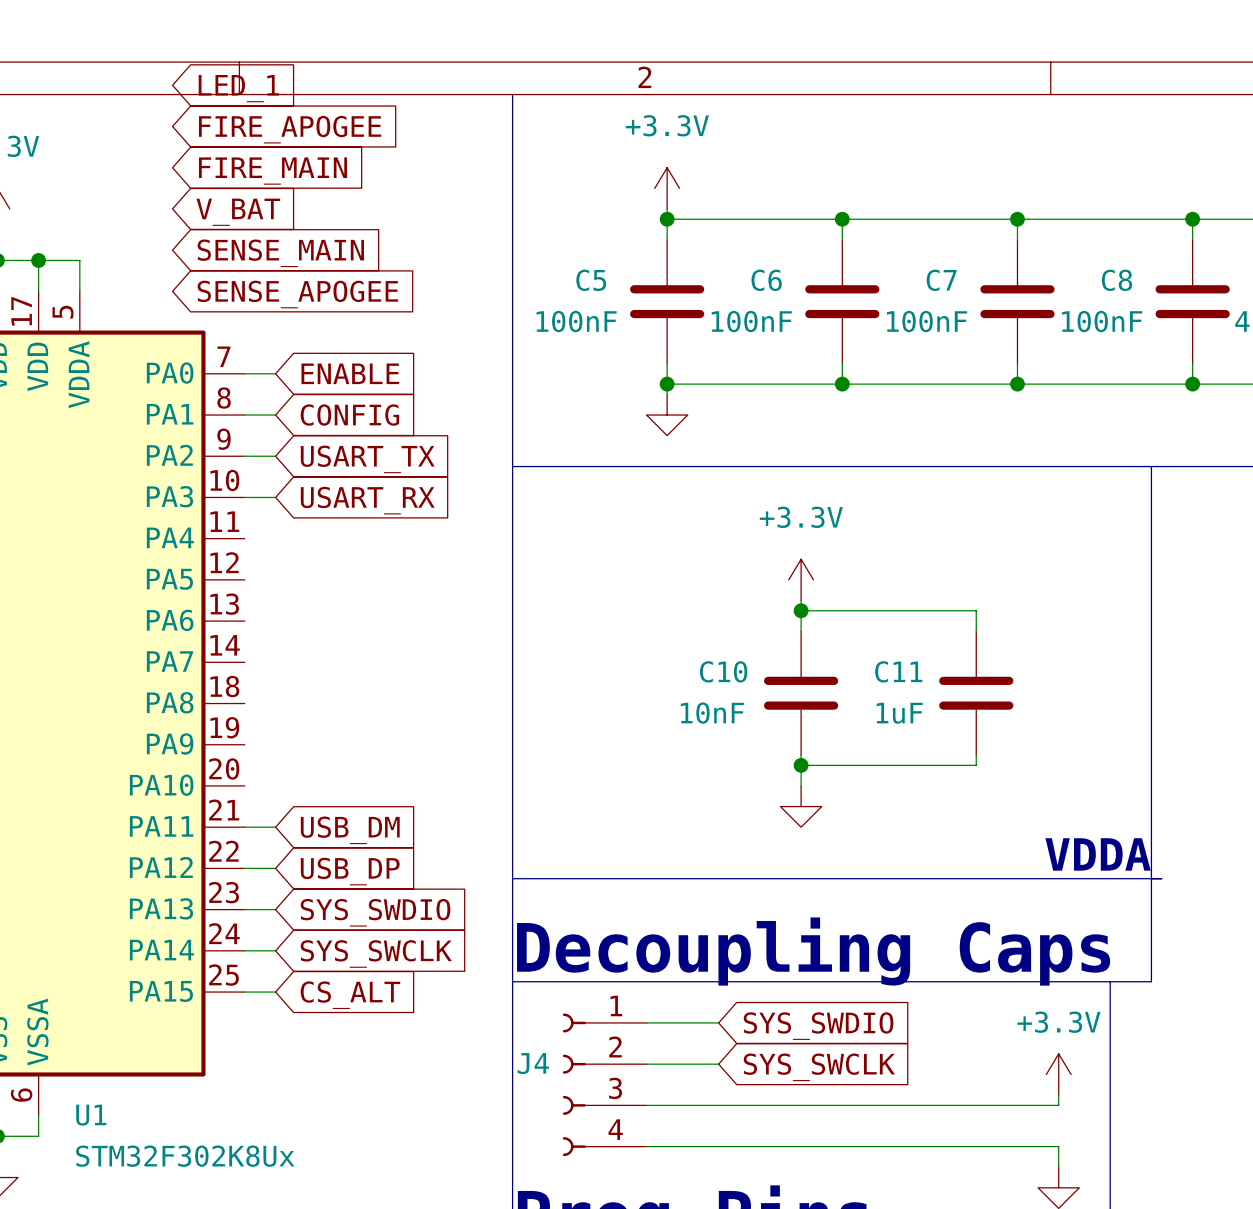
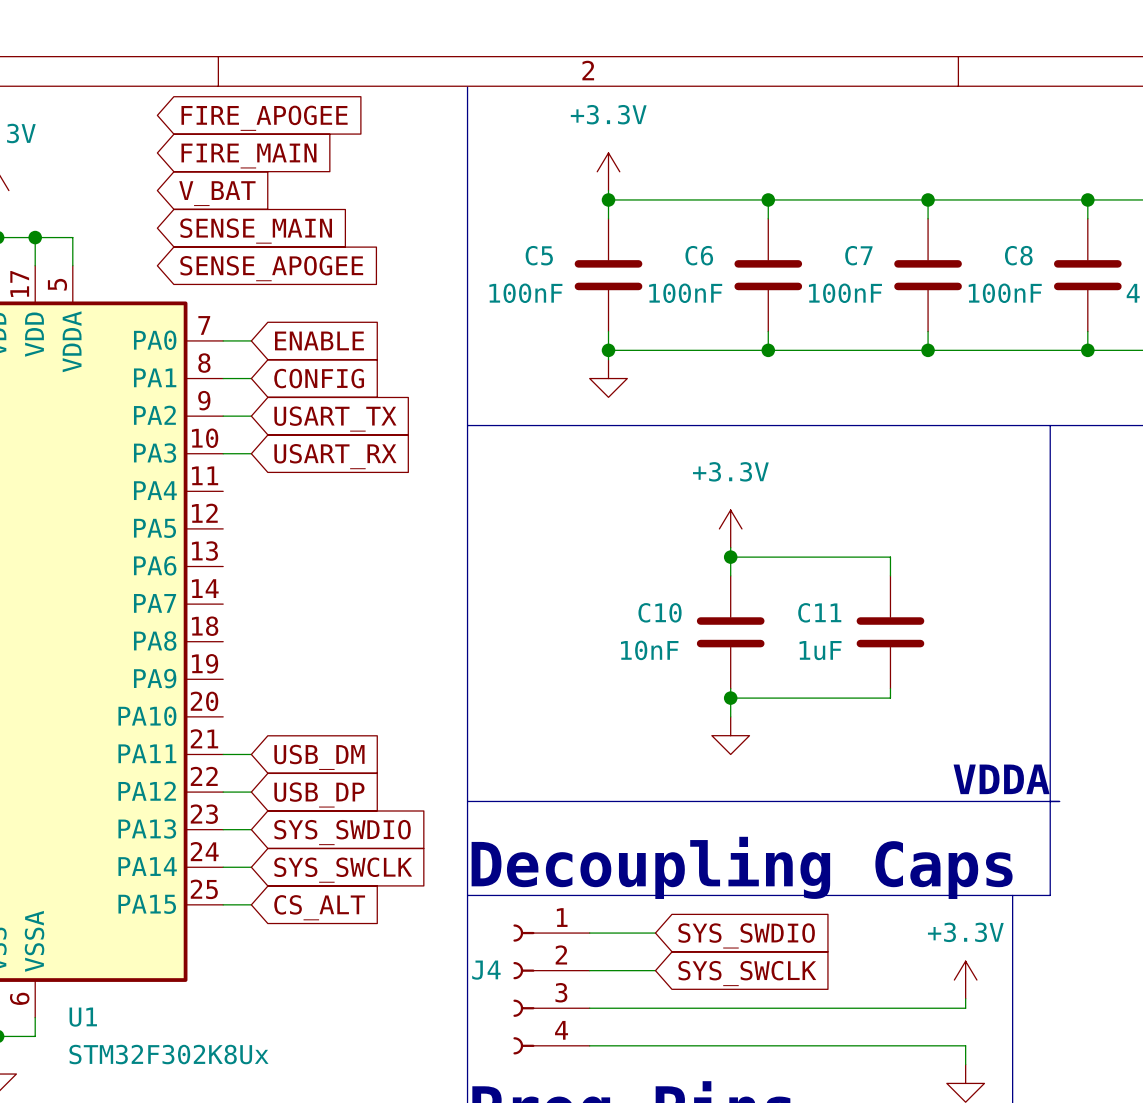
global label: LED_1 (238, 88) -> none

